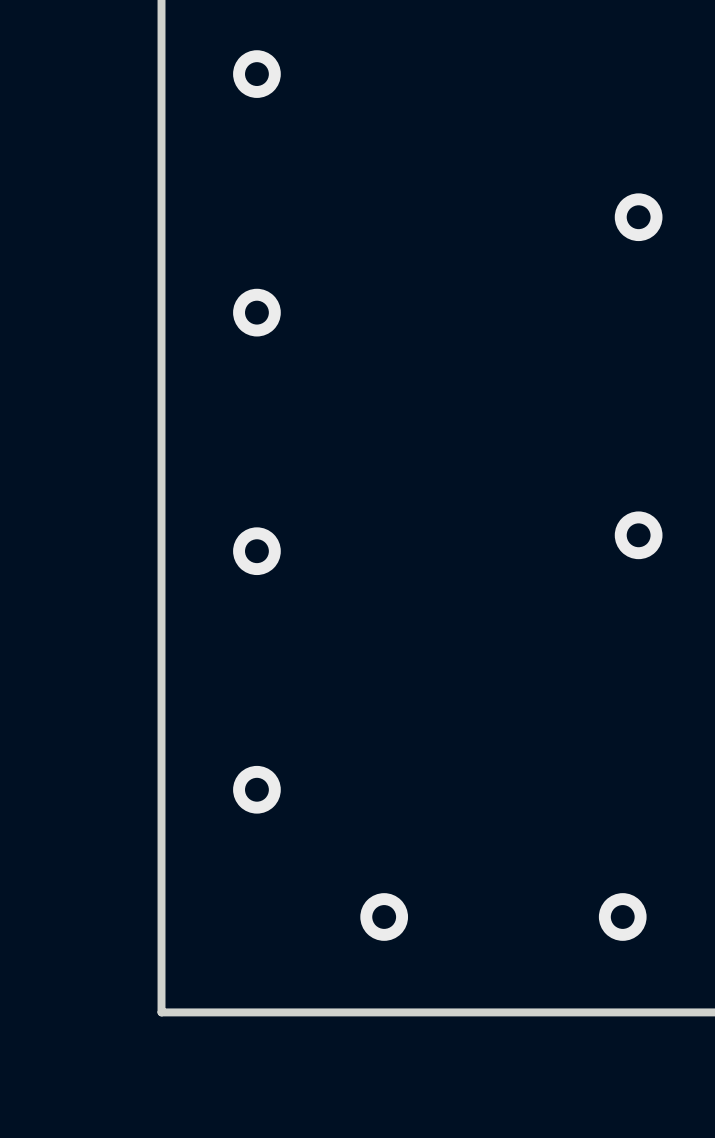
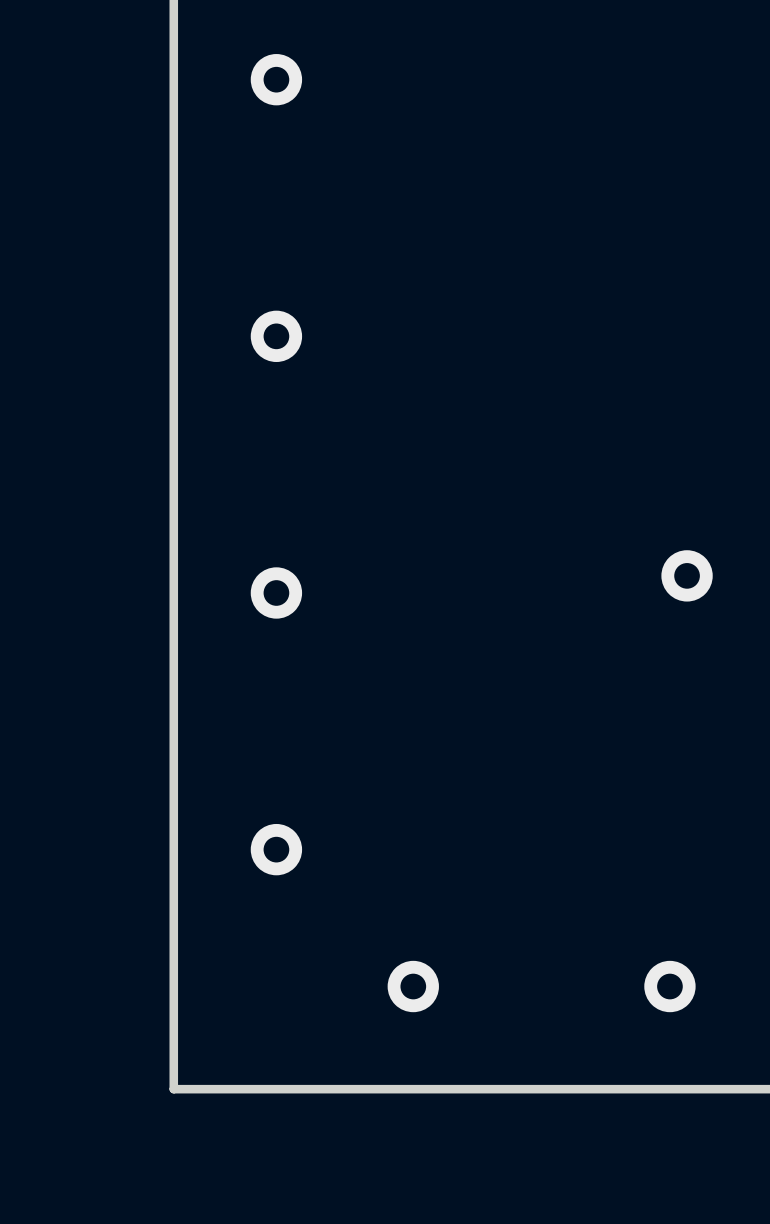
via: (638, 217) -> none

